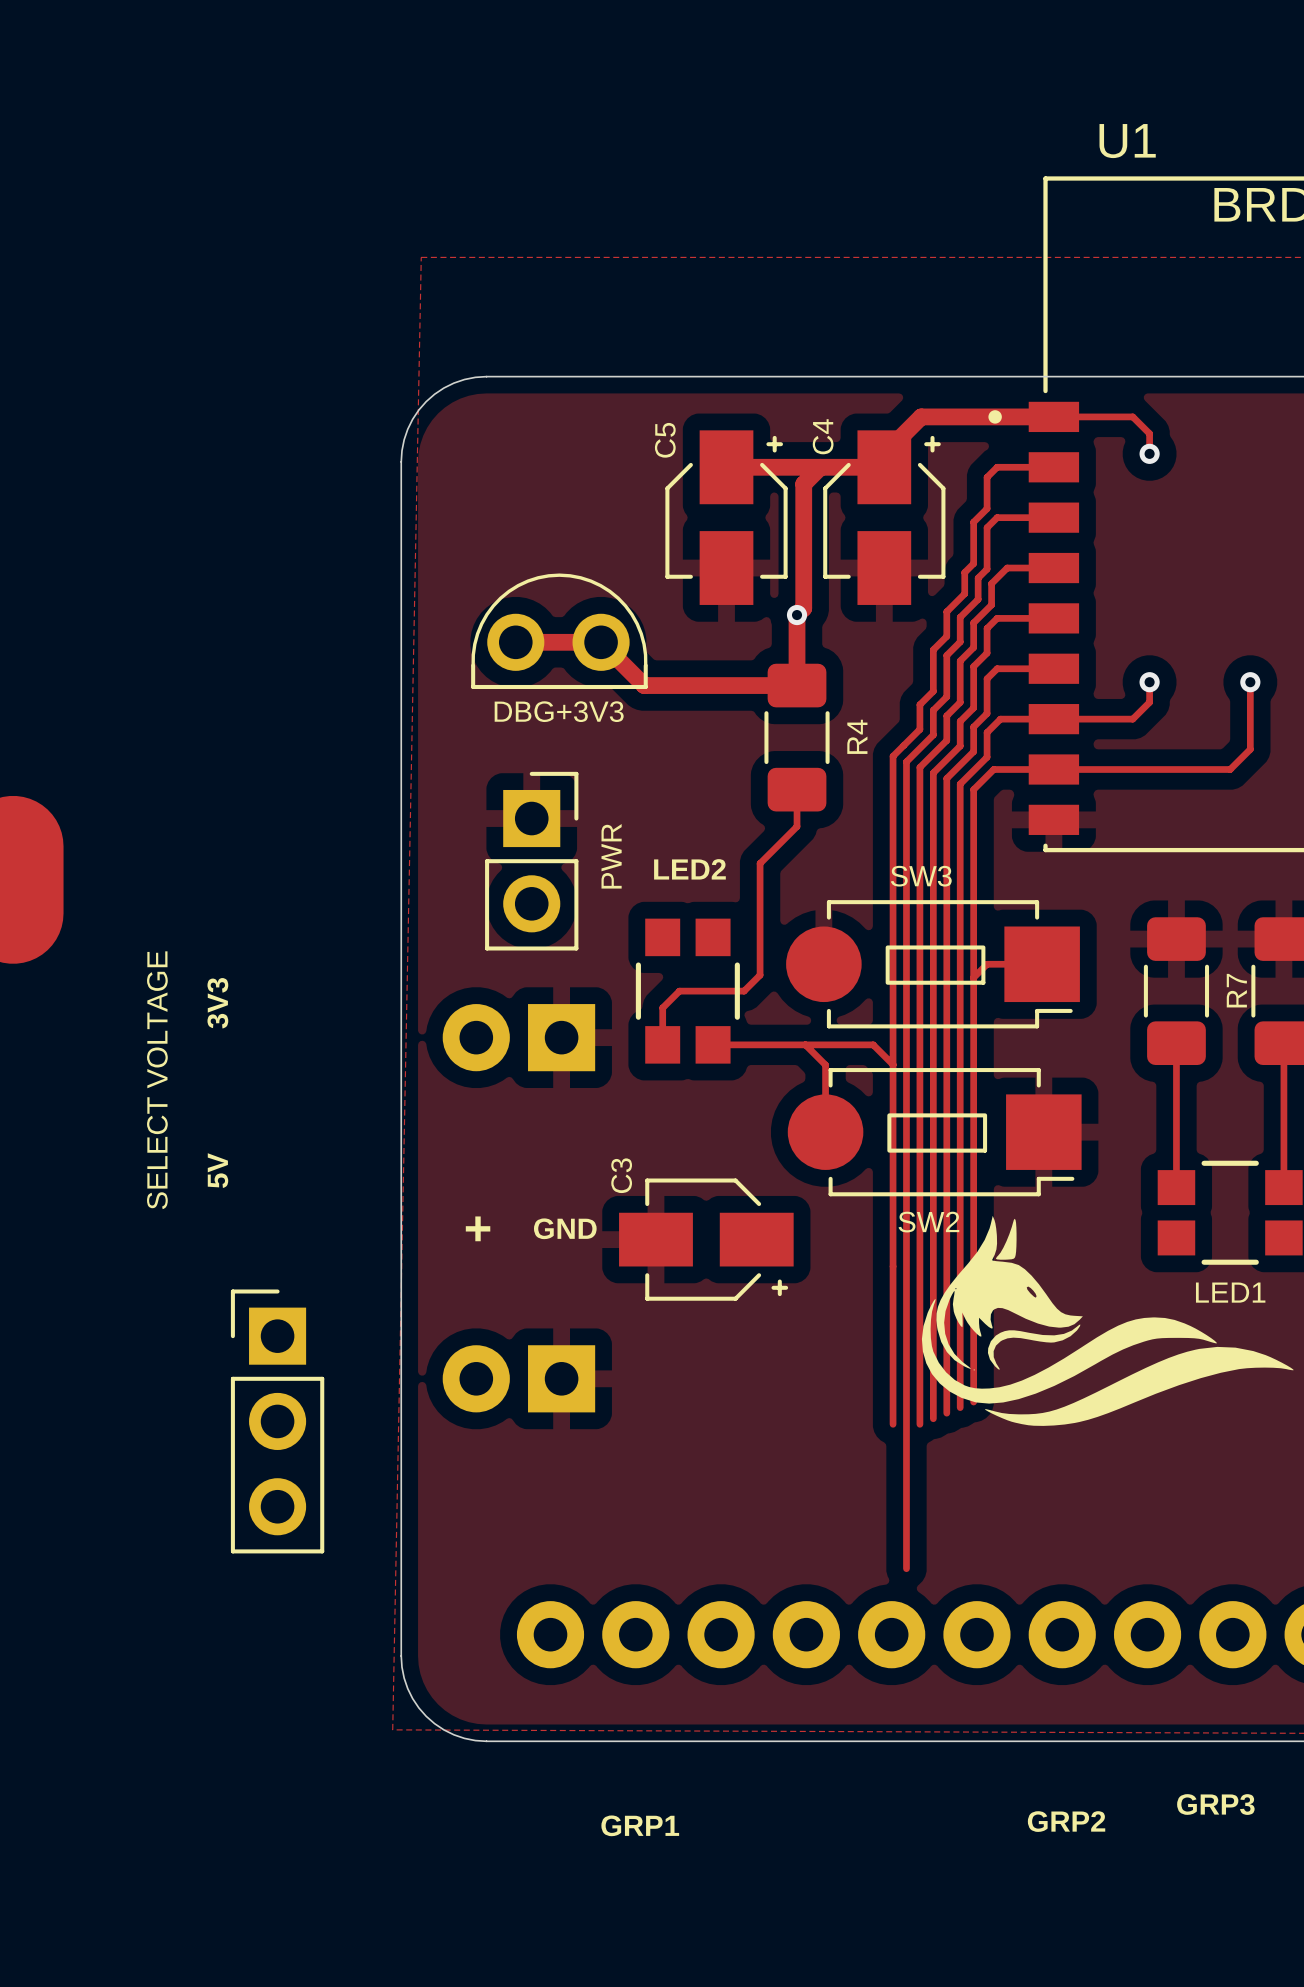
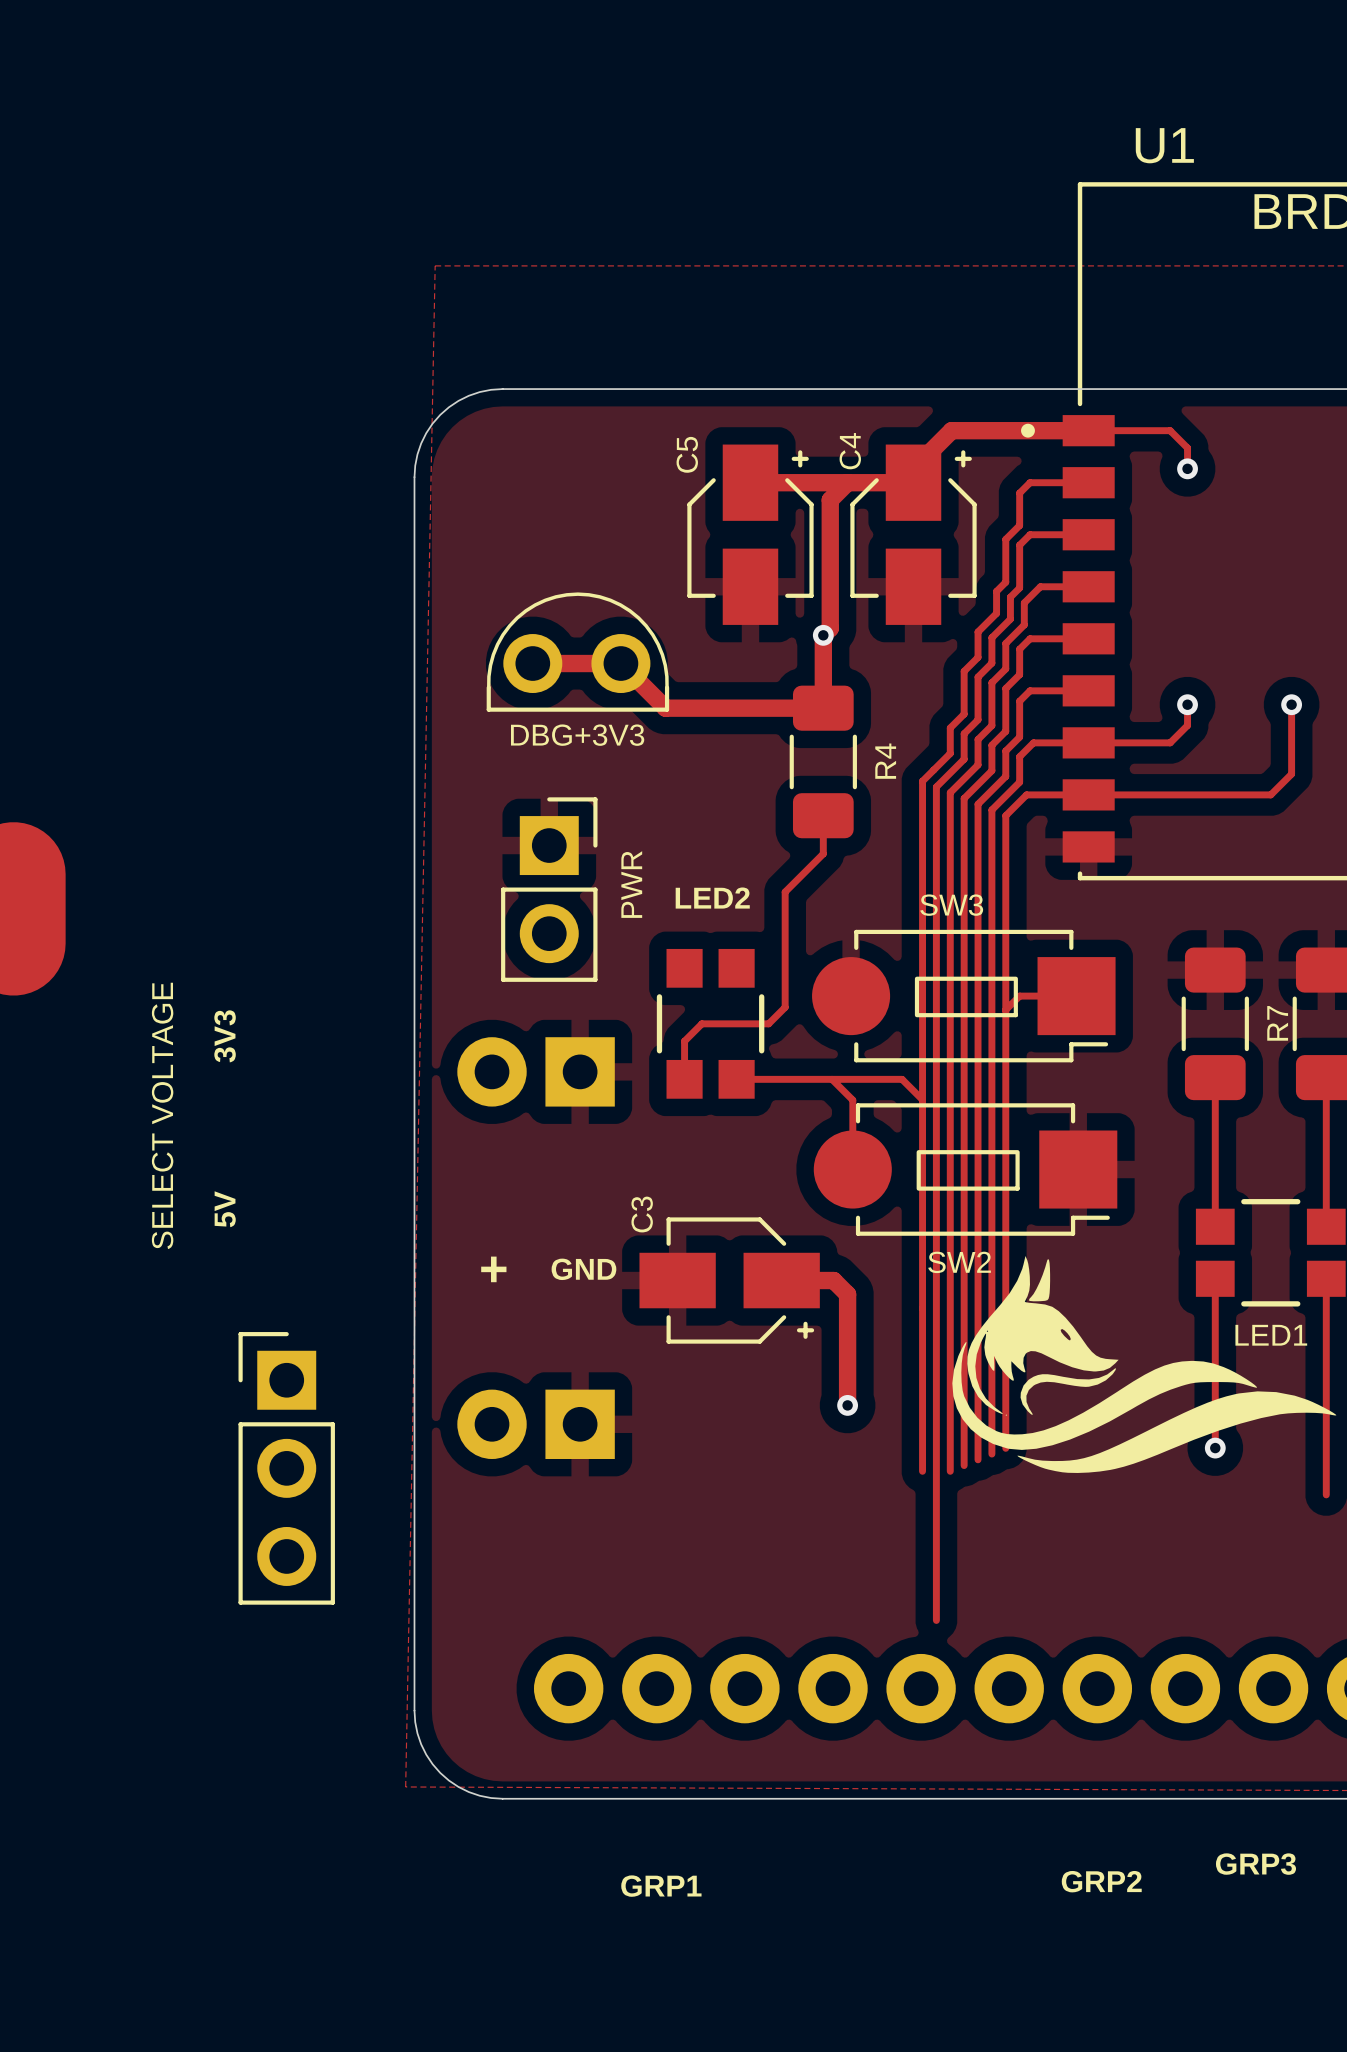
track: none -> (1215, 1278) (1215, 1448)
track: none -> (1326, 1278) (1326, 1494)
track: none -> (781, 1280) (833, 1280) (847, 1294) (847, 1405)
via: none -> (847, 1405)
via: none -> (1215, 1448)

